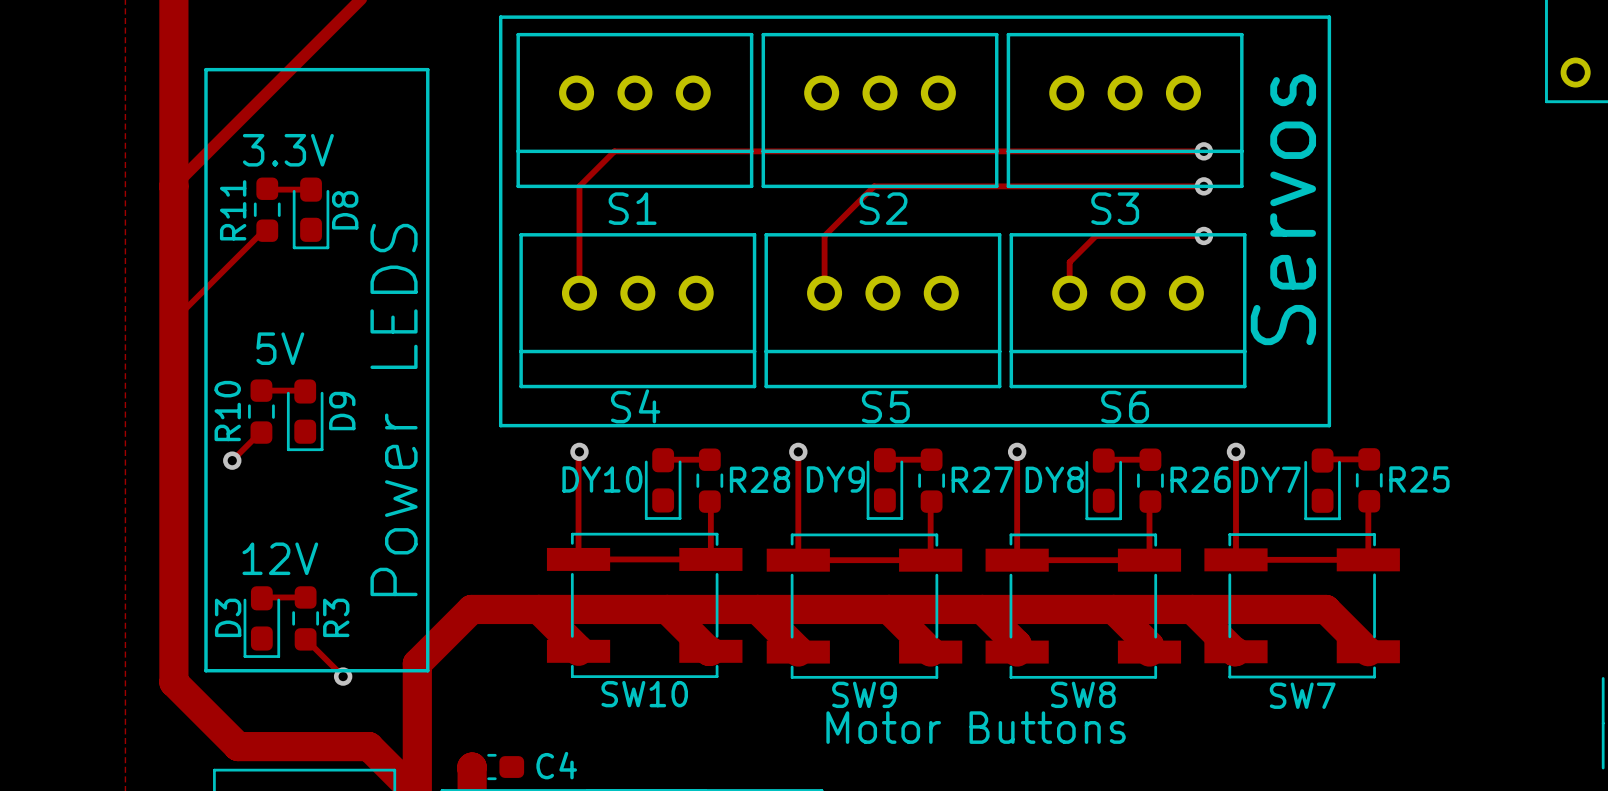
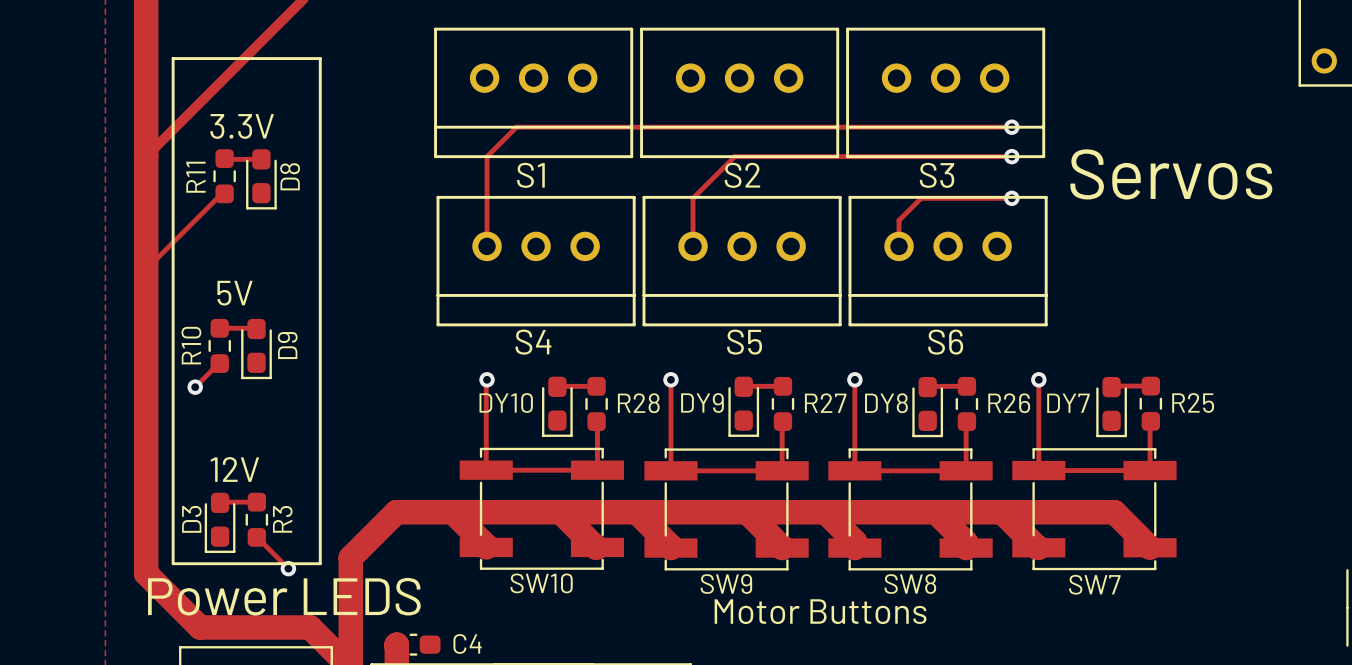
line: (500, 17) (1329, 17) (1329, 425) (500, 425) (500, 17) -> none
line: (381, 69) (427, 69) (427, 670) (381, 670) -> (320, 58) (320, 563)
text rotation: 0° (1283, 209) -> 90° clockwise (1171, 174)
text rotation: 0° (394, 410) -> 90° clockwise (284, 596)

